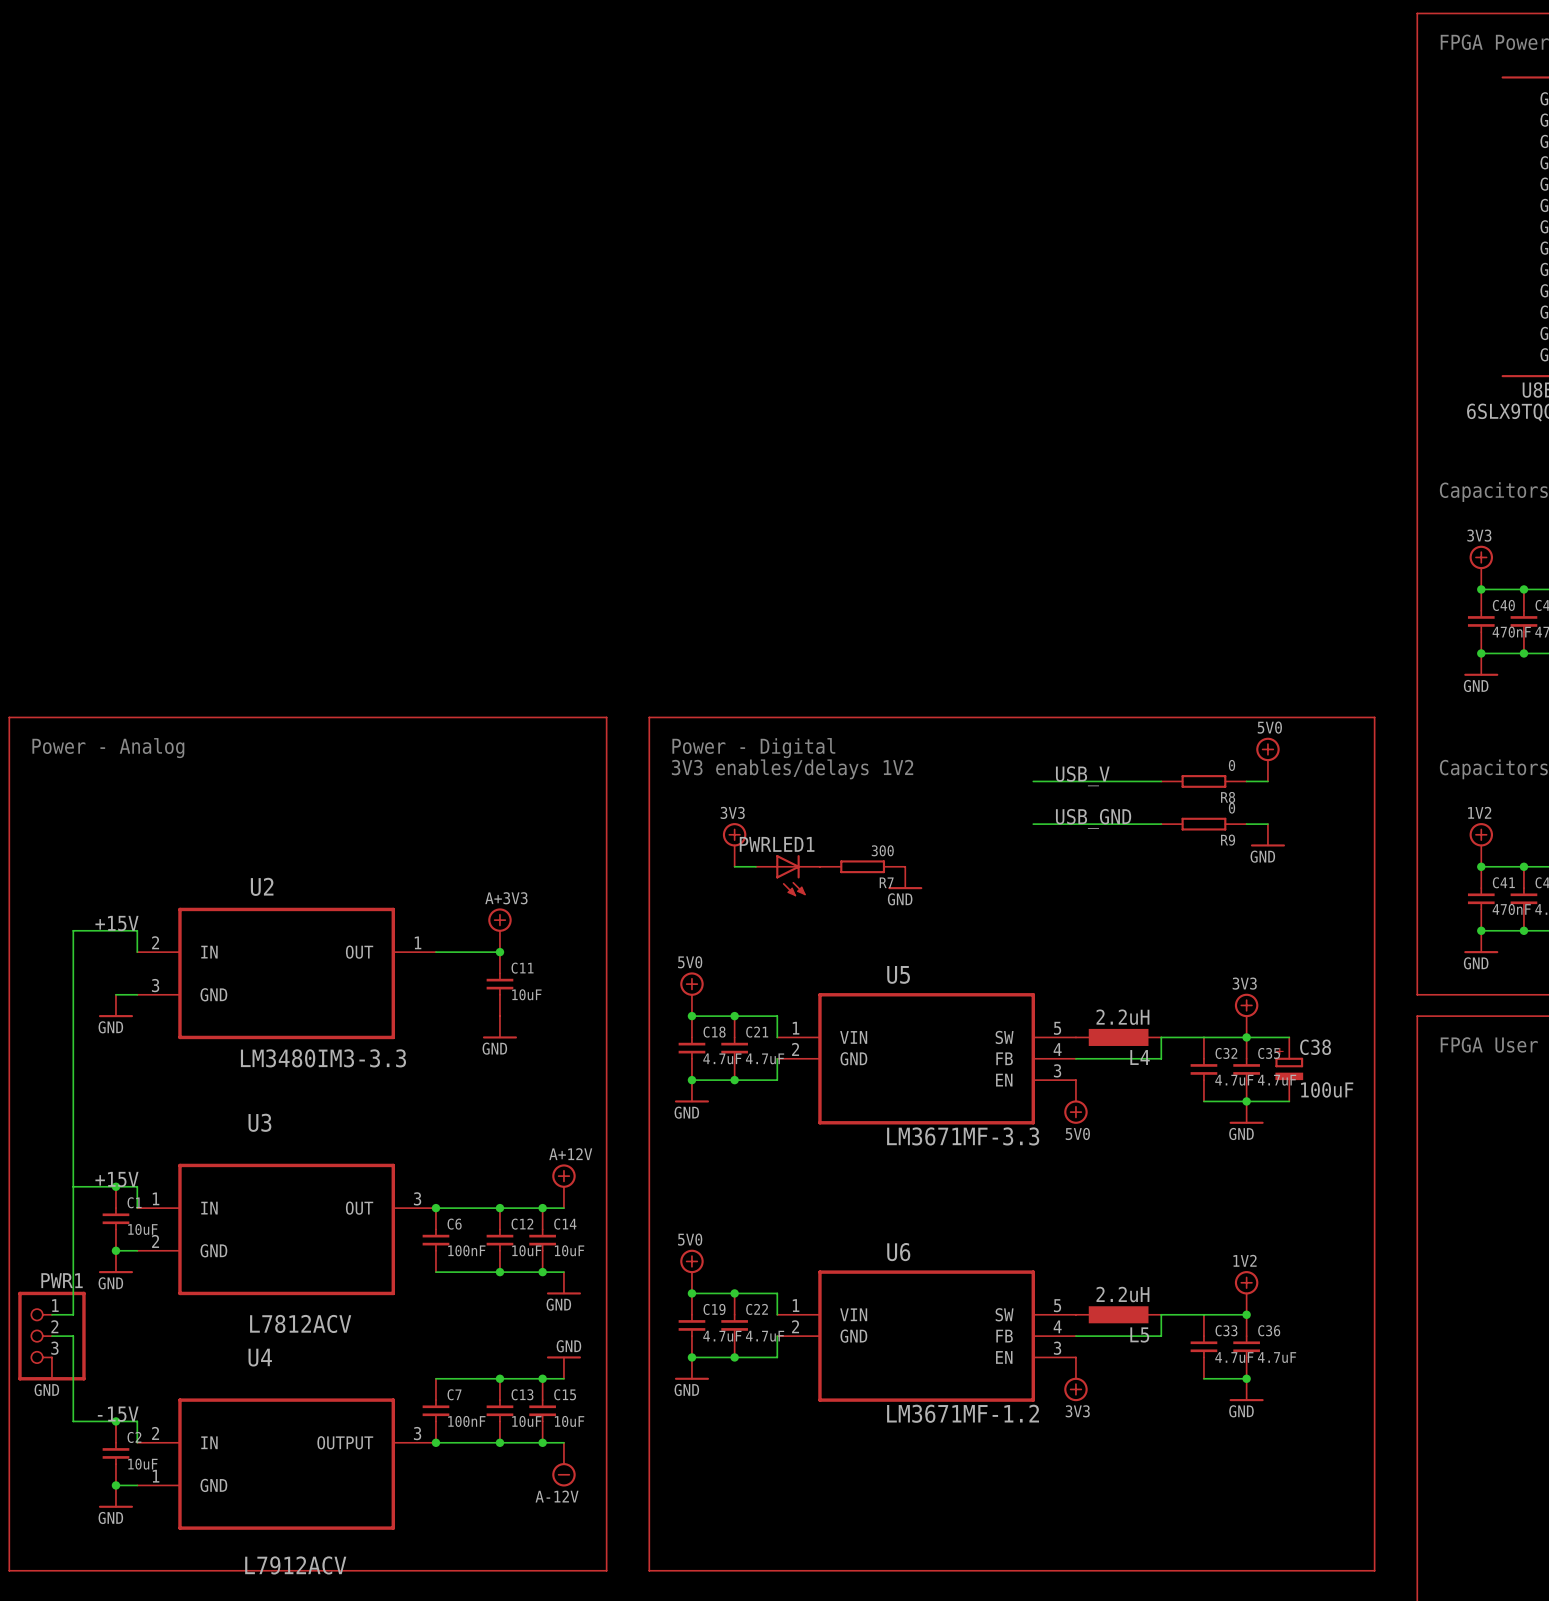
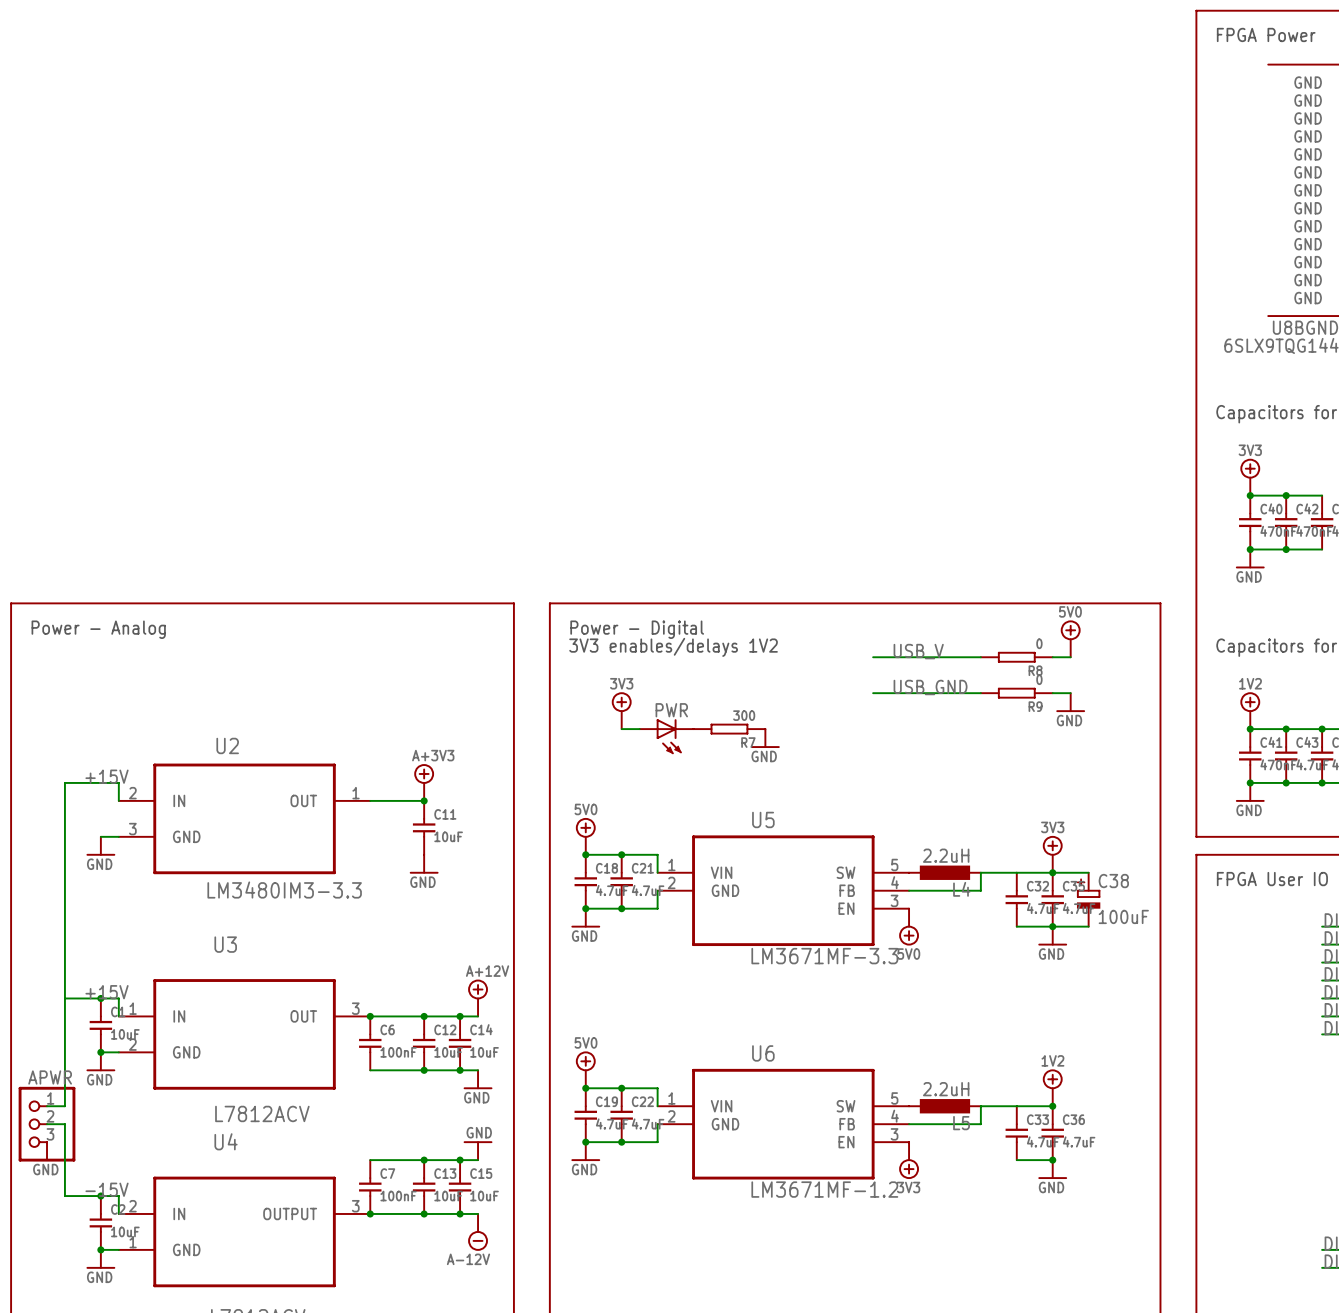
PWRLED1 name: PWRLED1 (777, 844) -> PWR (671, 710)
PWR1 name: PWR1 (62, 1280) -> APWR (50, 1077)

